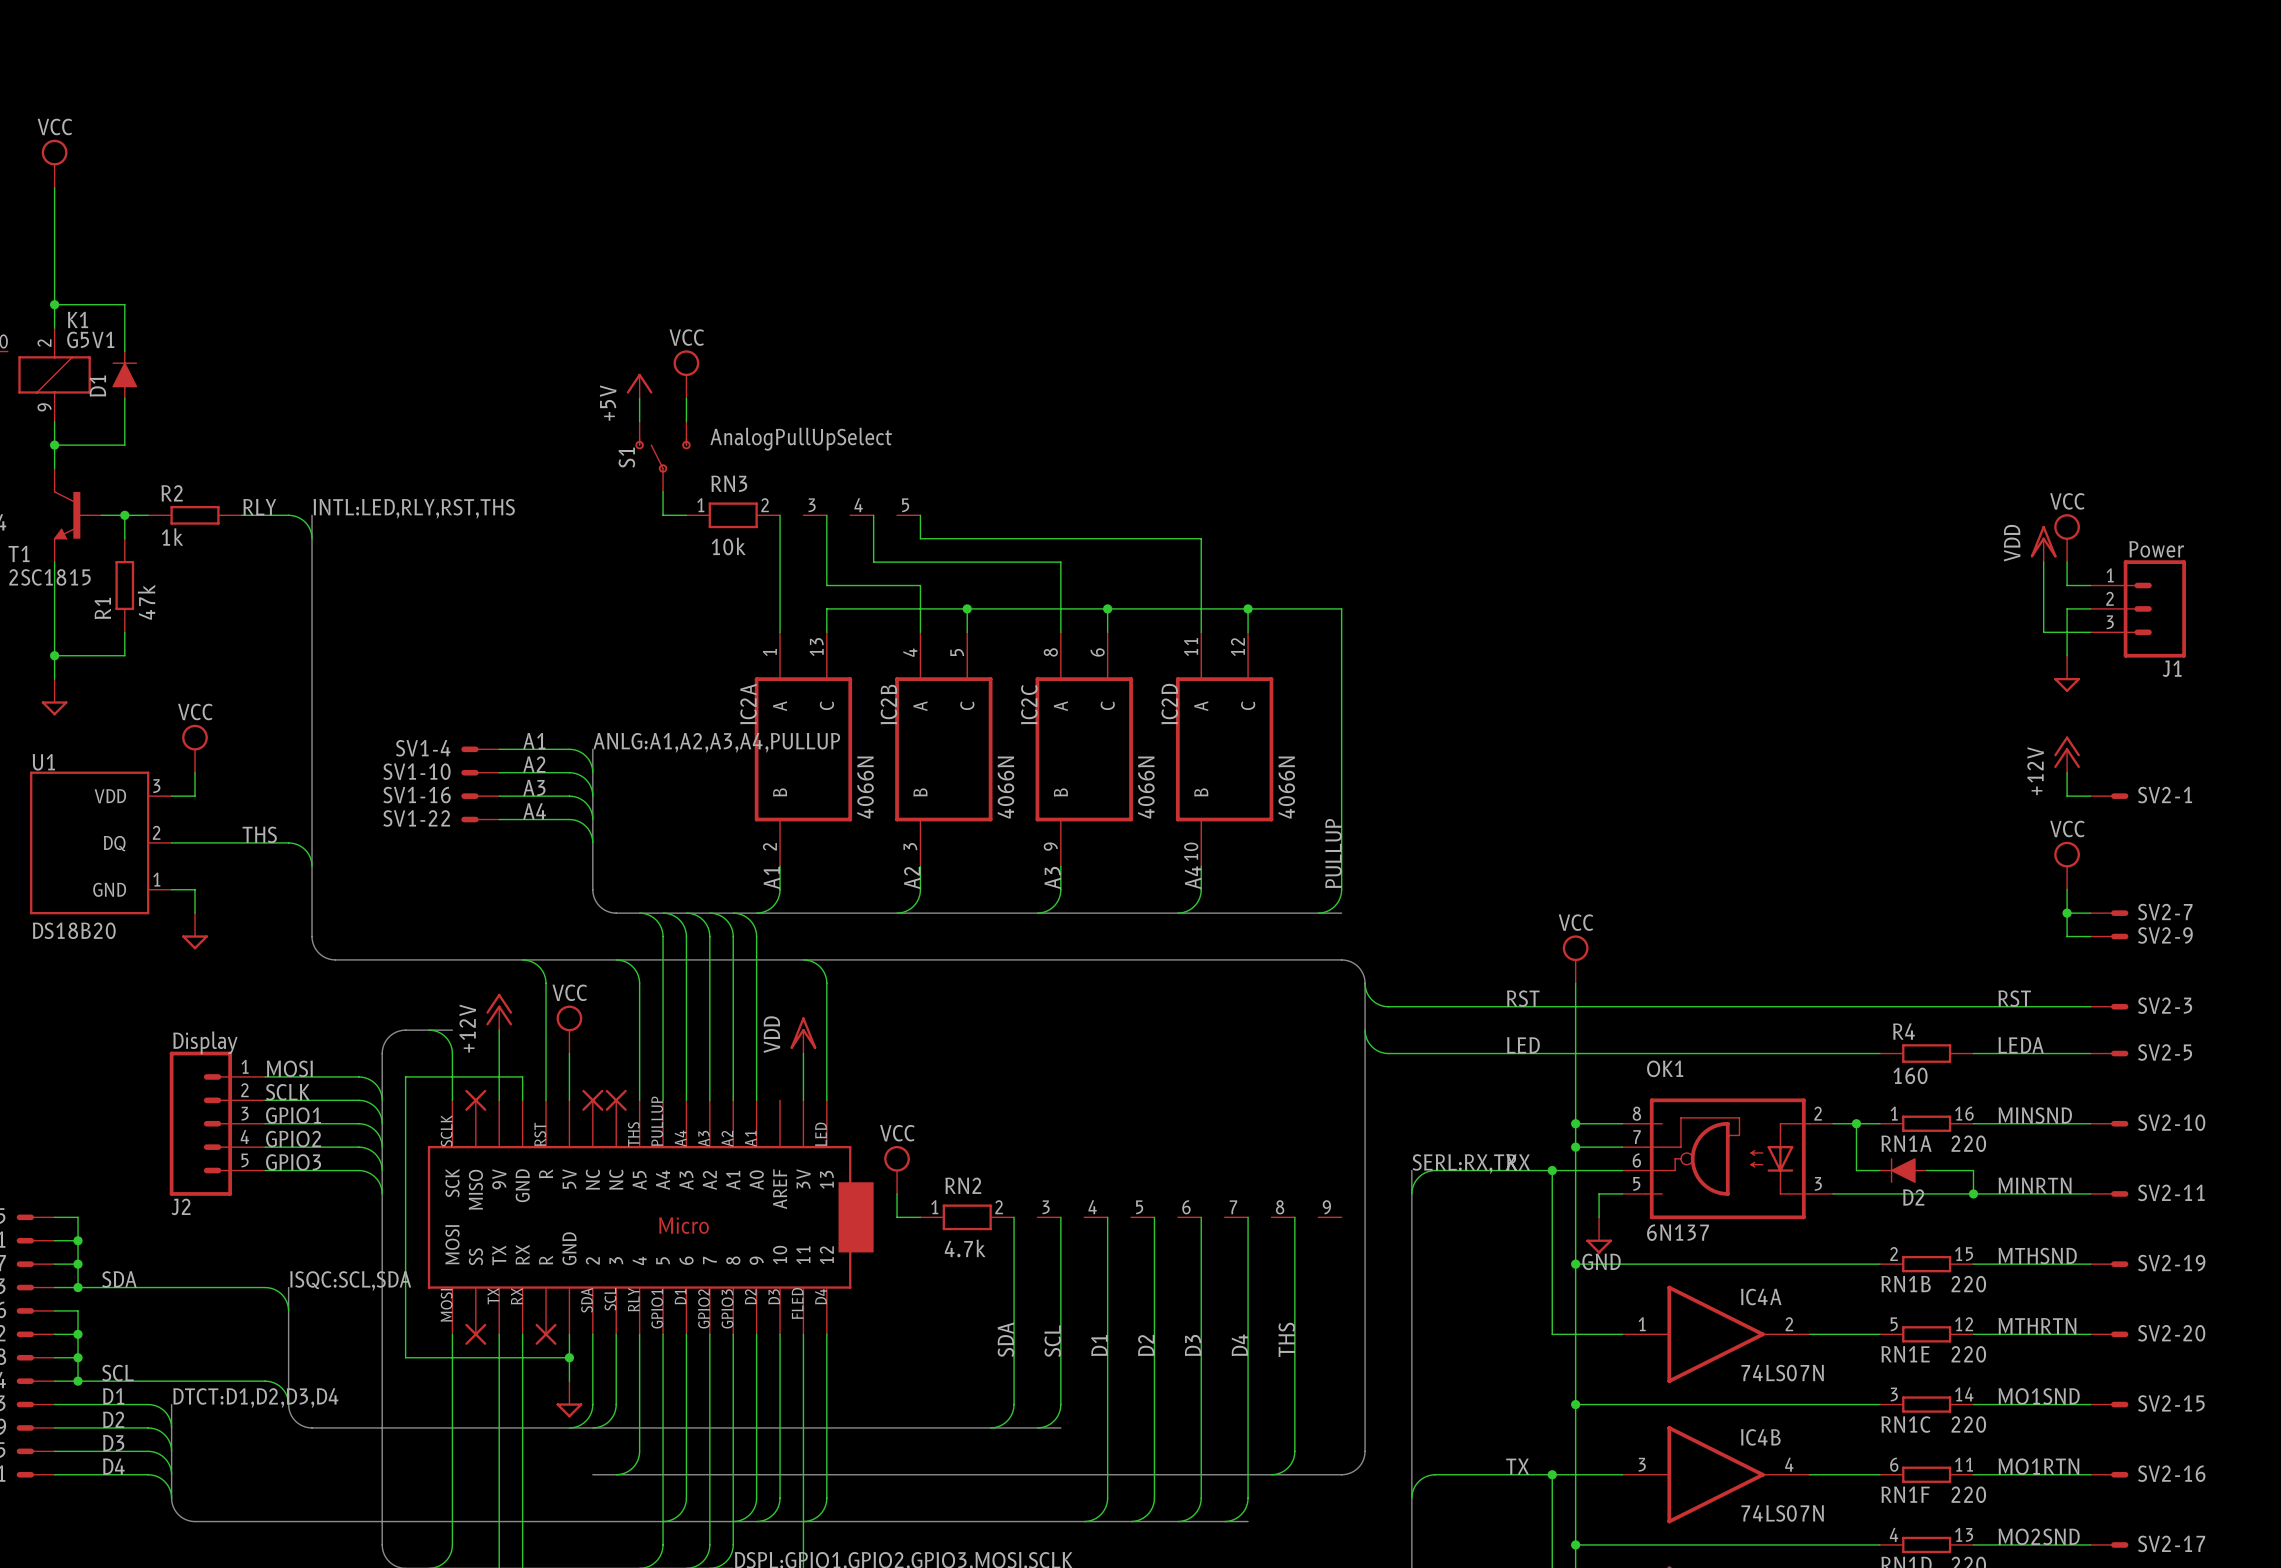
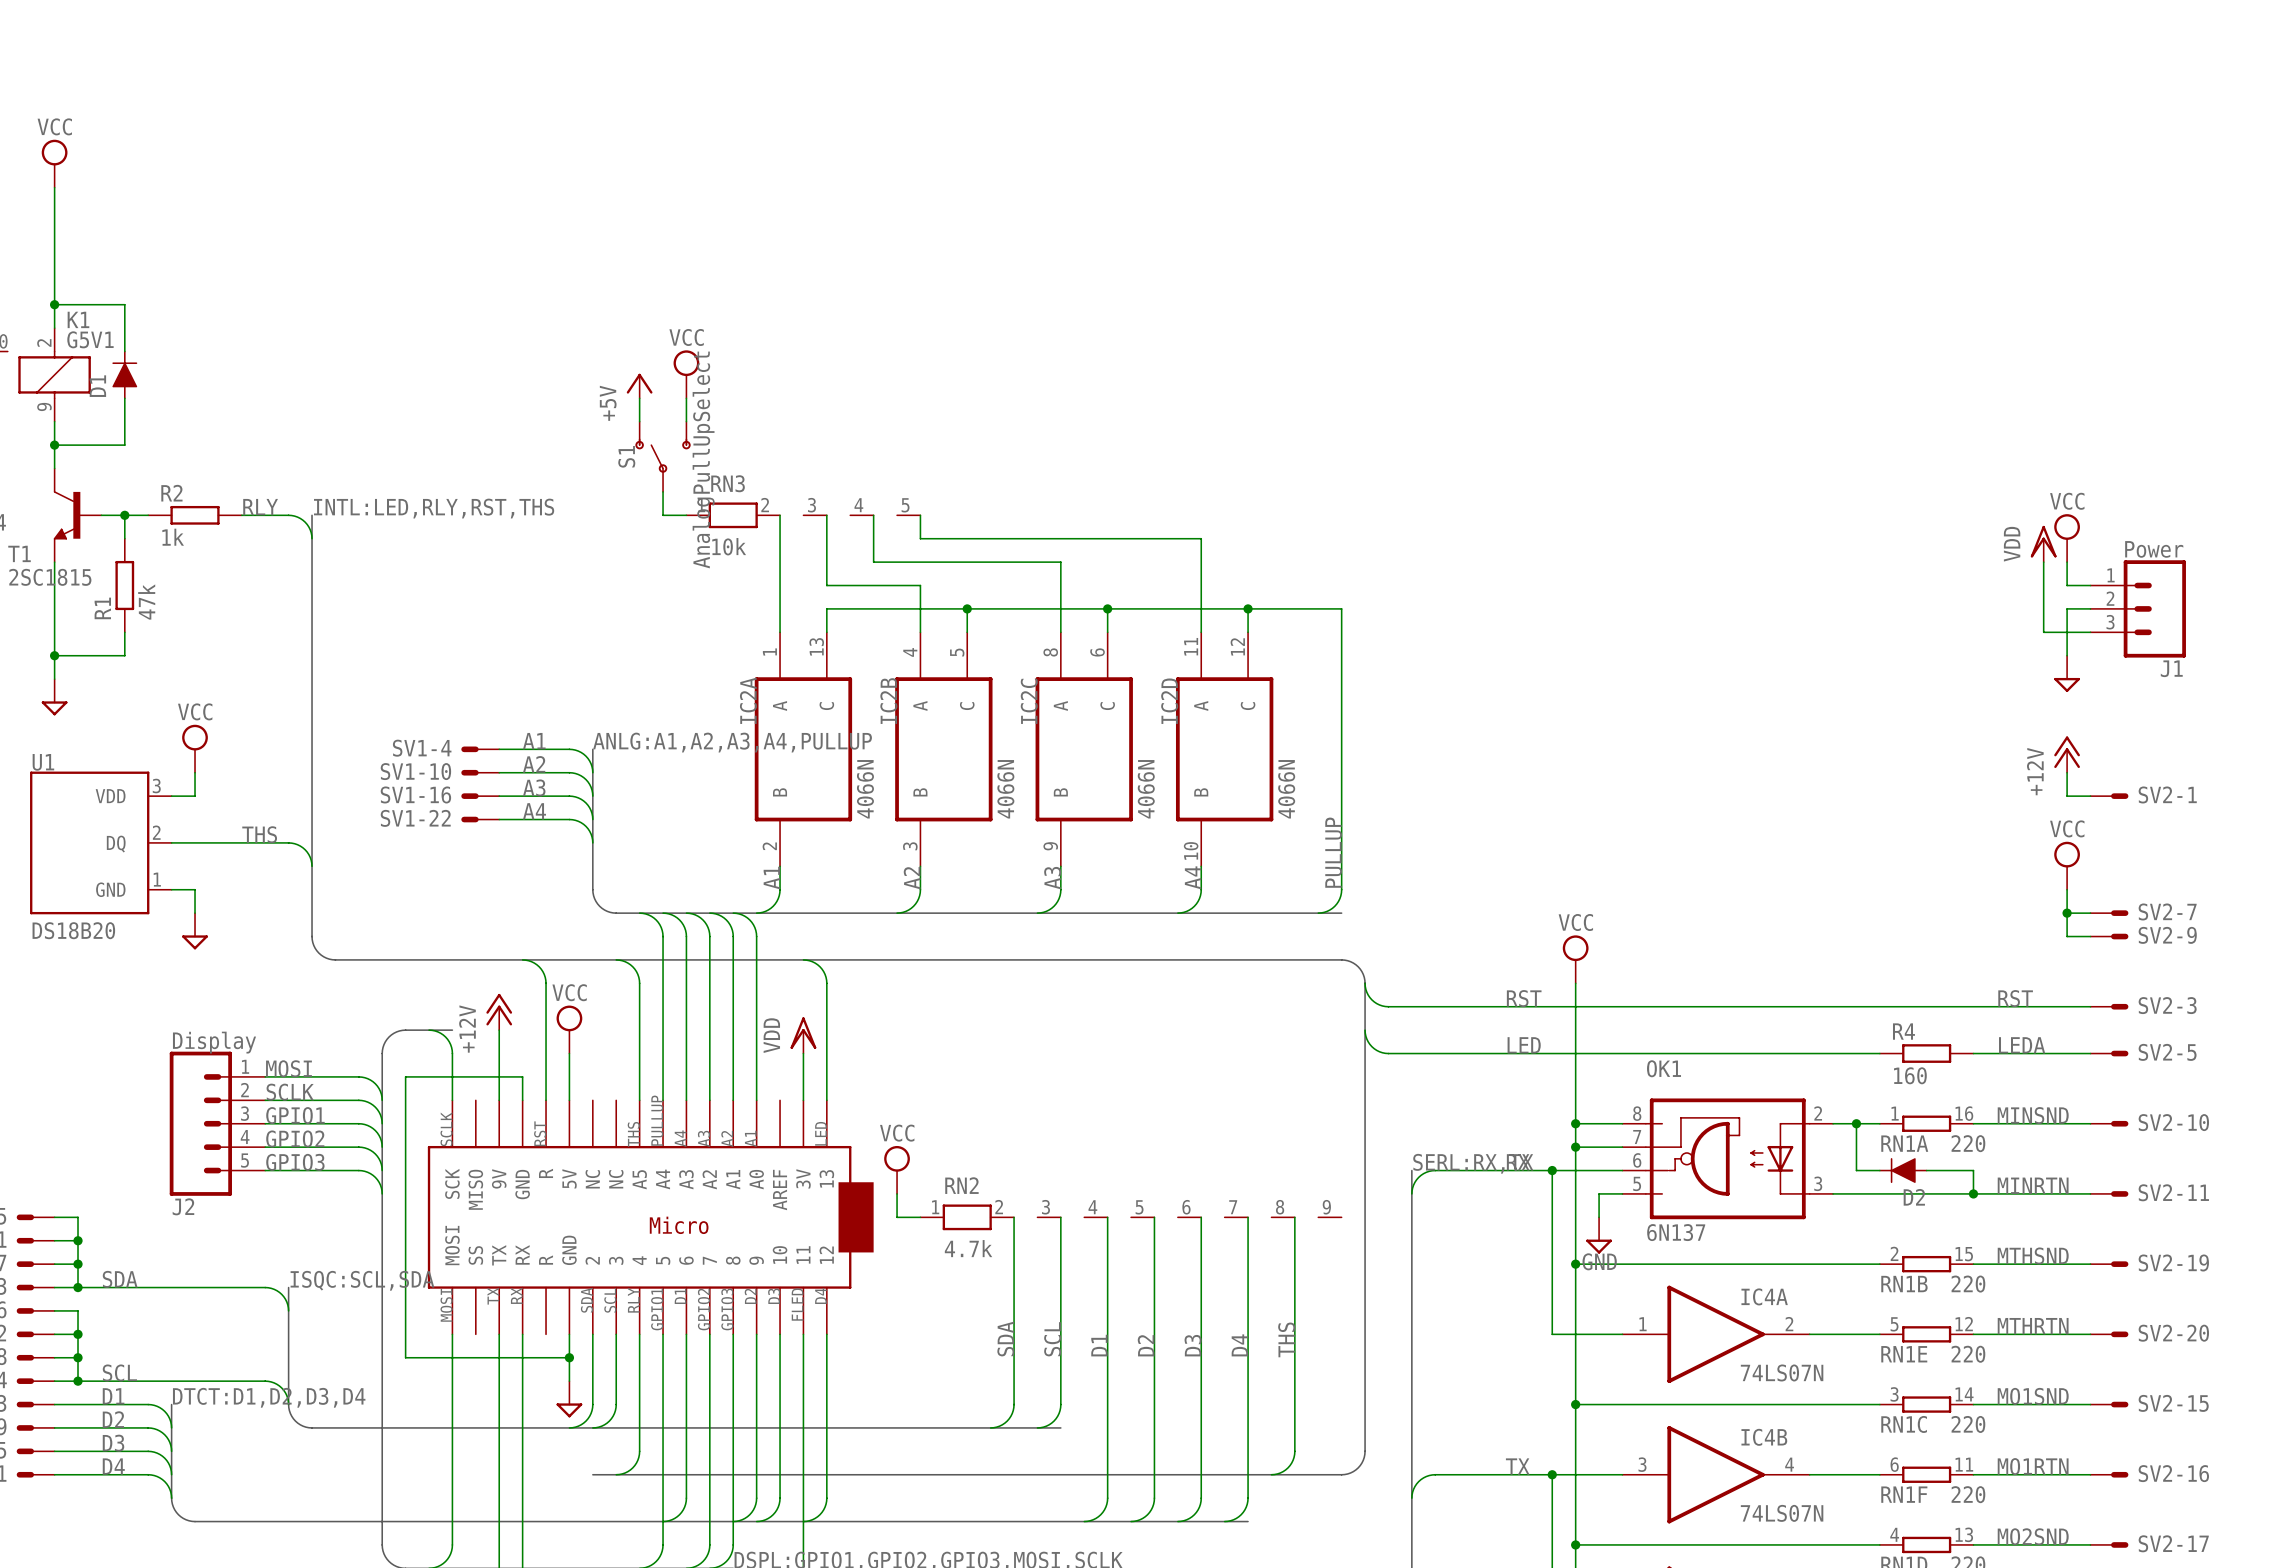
S1 value rotation: 0° (801, 439) -> 90° counterclockwise (703, 459)
part: (475, 1100) -> none
part: (592, 1100) -> none
part: (616, 1100) -> none
part: (475, 1334) -> none
part: (546, 1334) -> none

